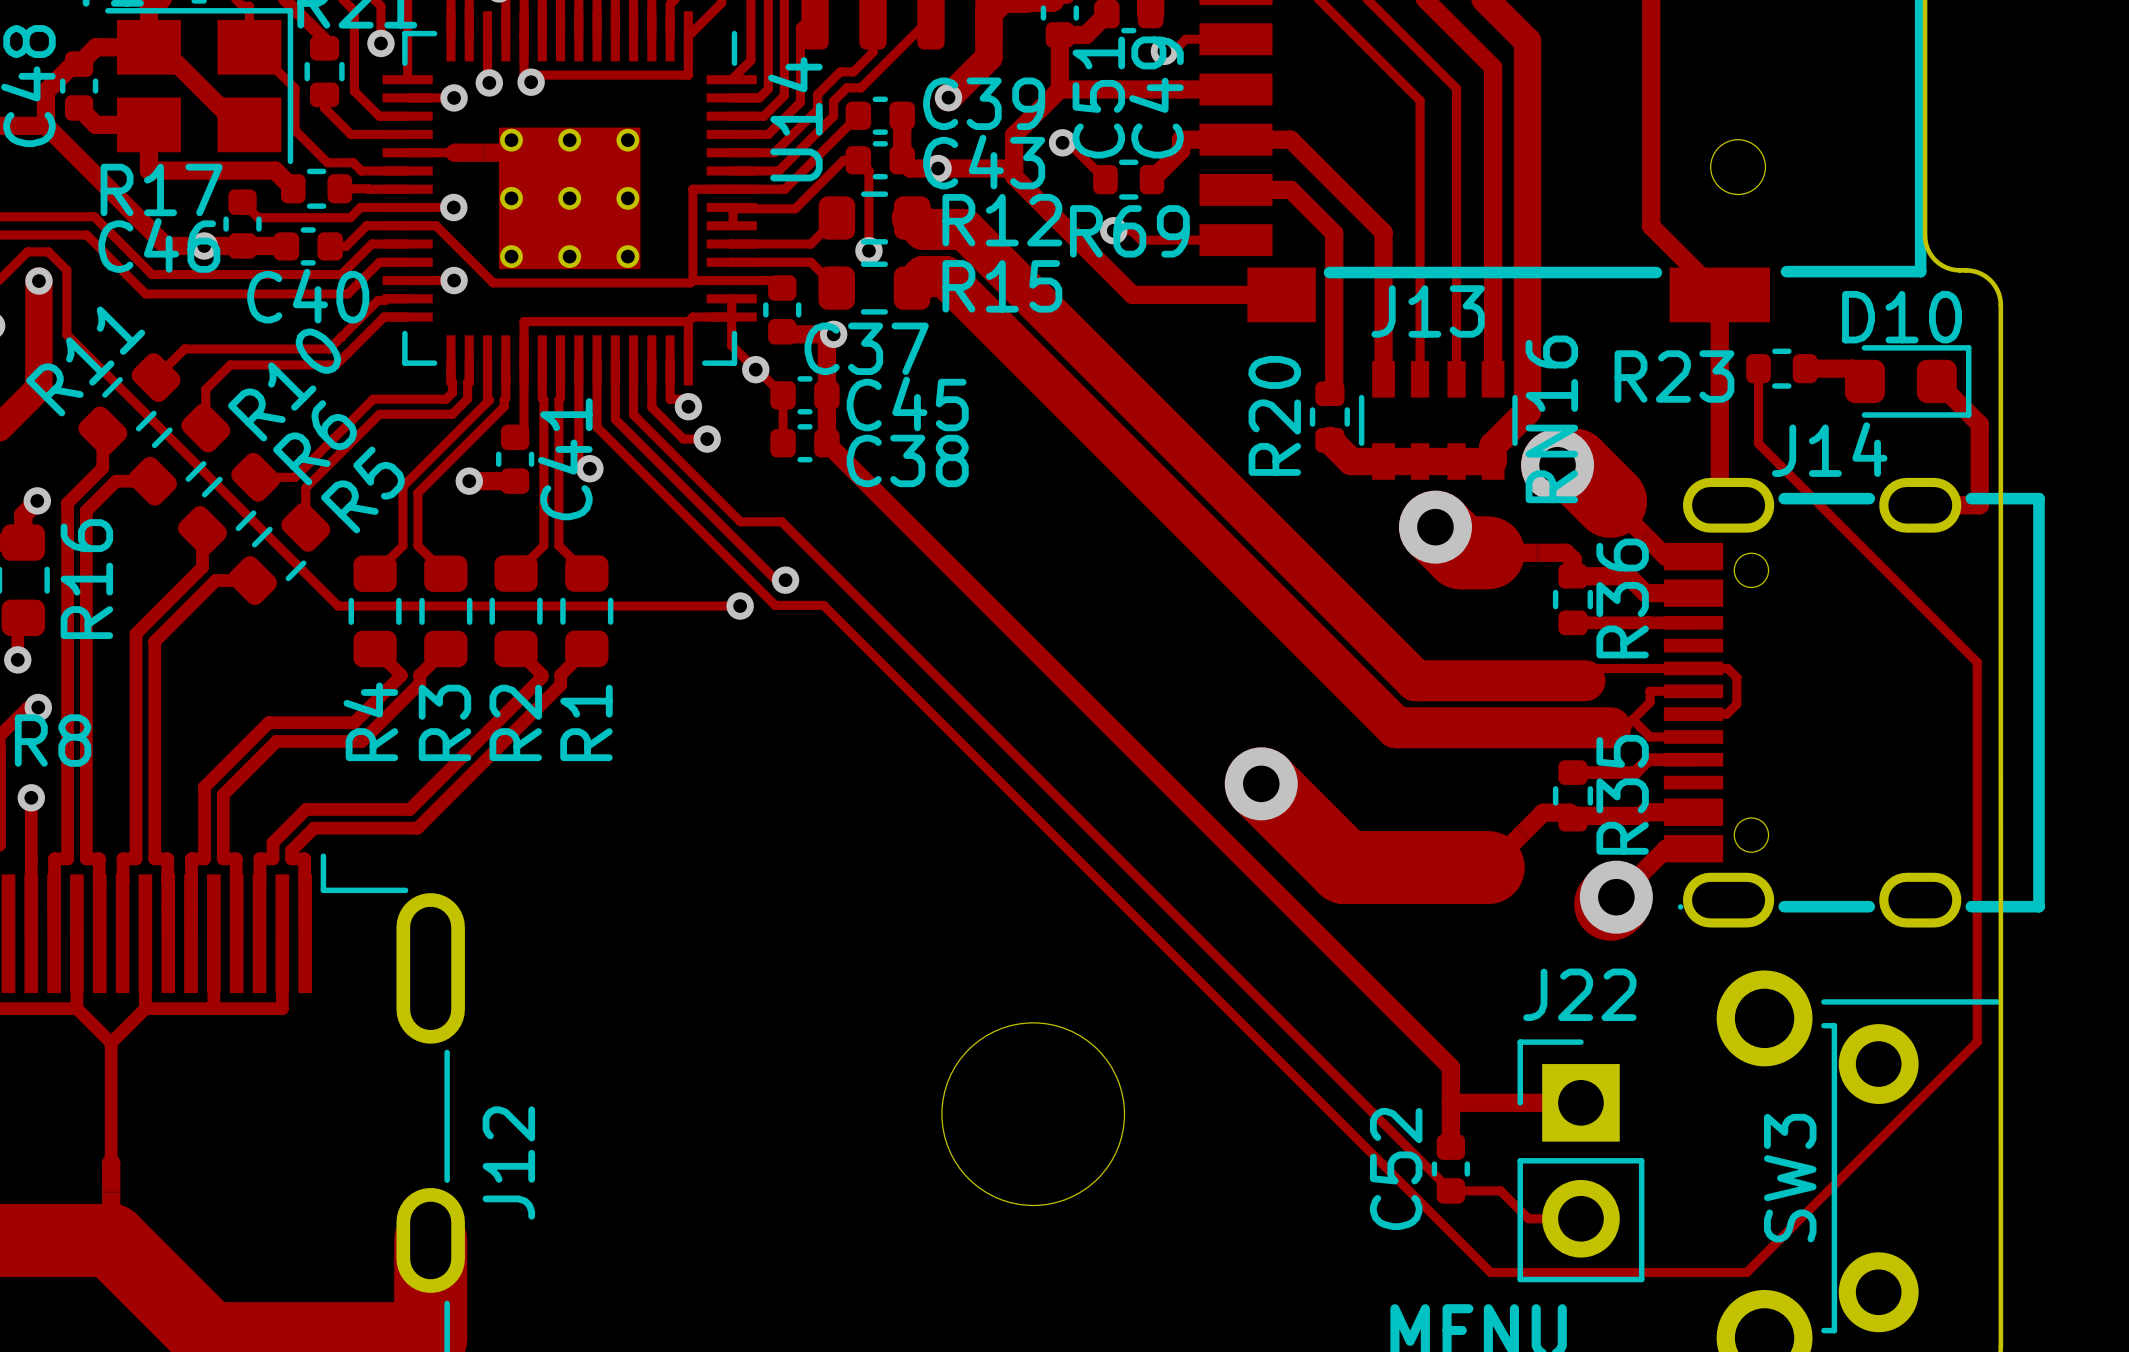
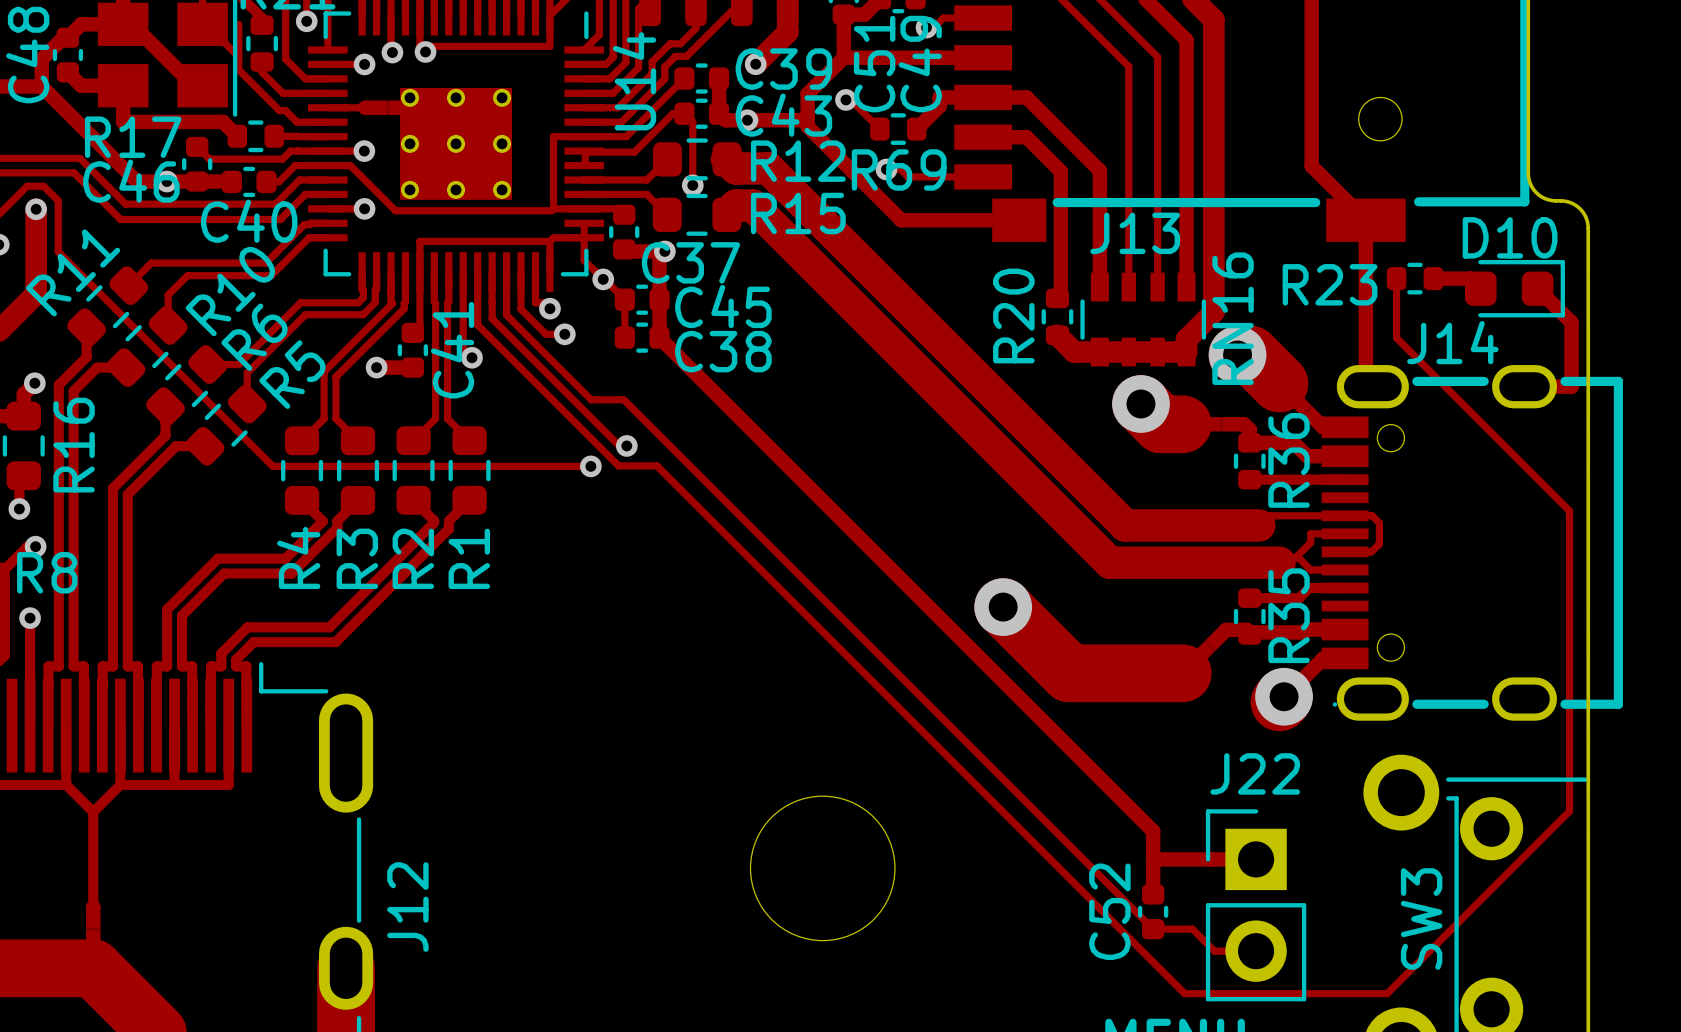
track: (295, 104) (295, 130) (327, 162) (353, 162) (361, 170) (368, 170) -> (238, 69) (279, 110) (285, 110) (297, 122)

